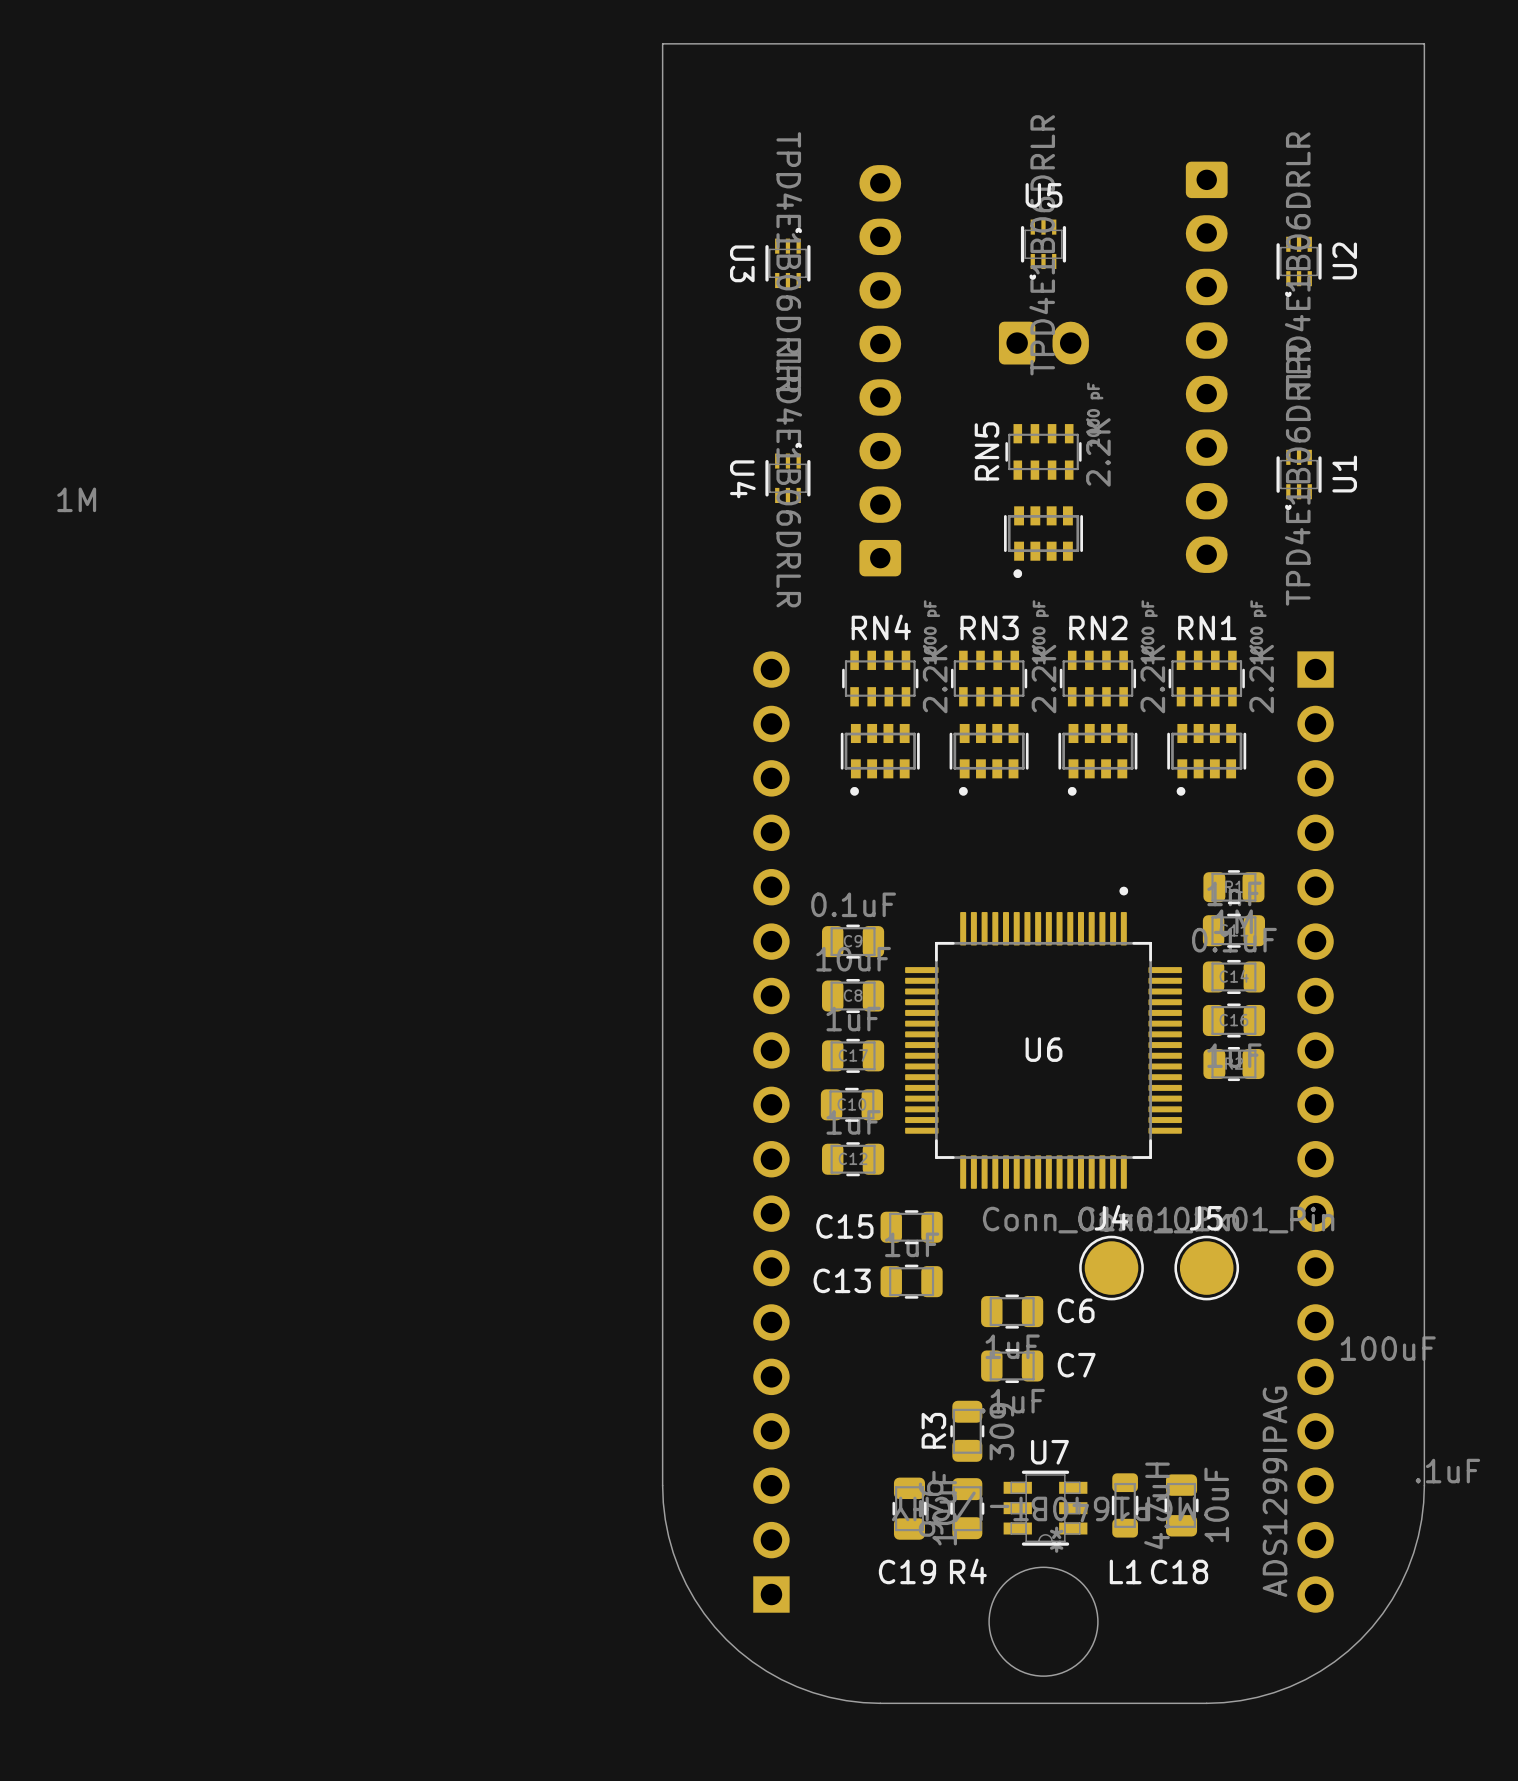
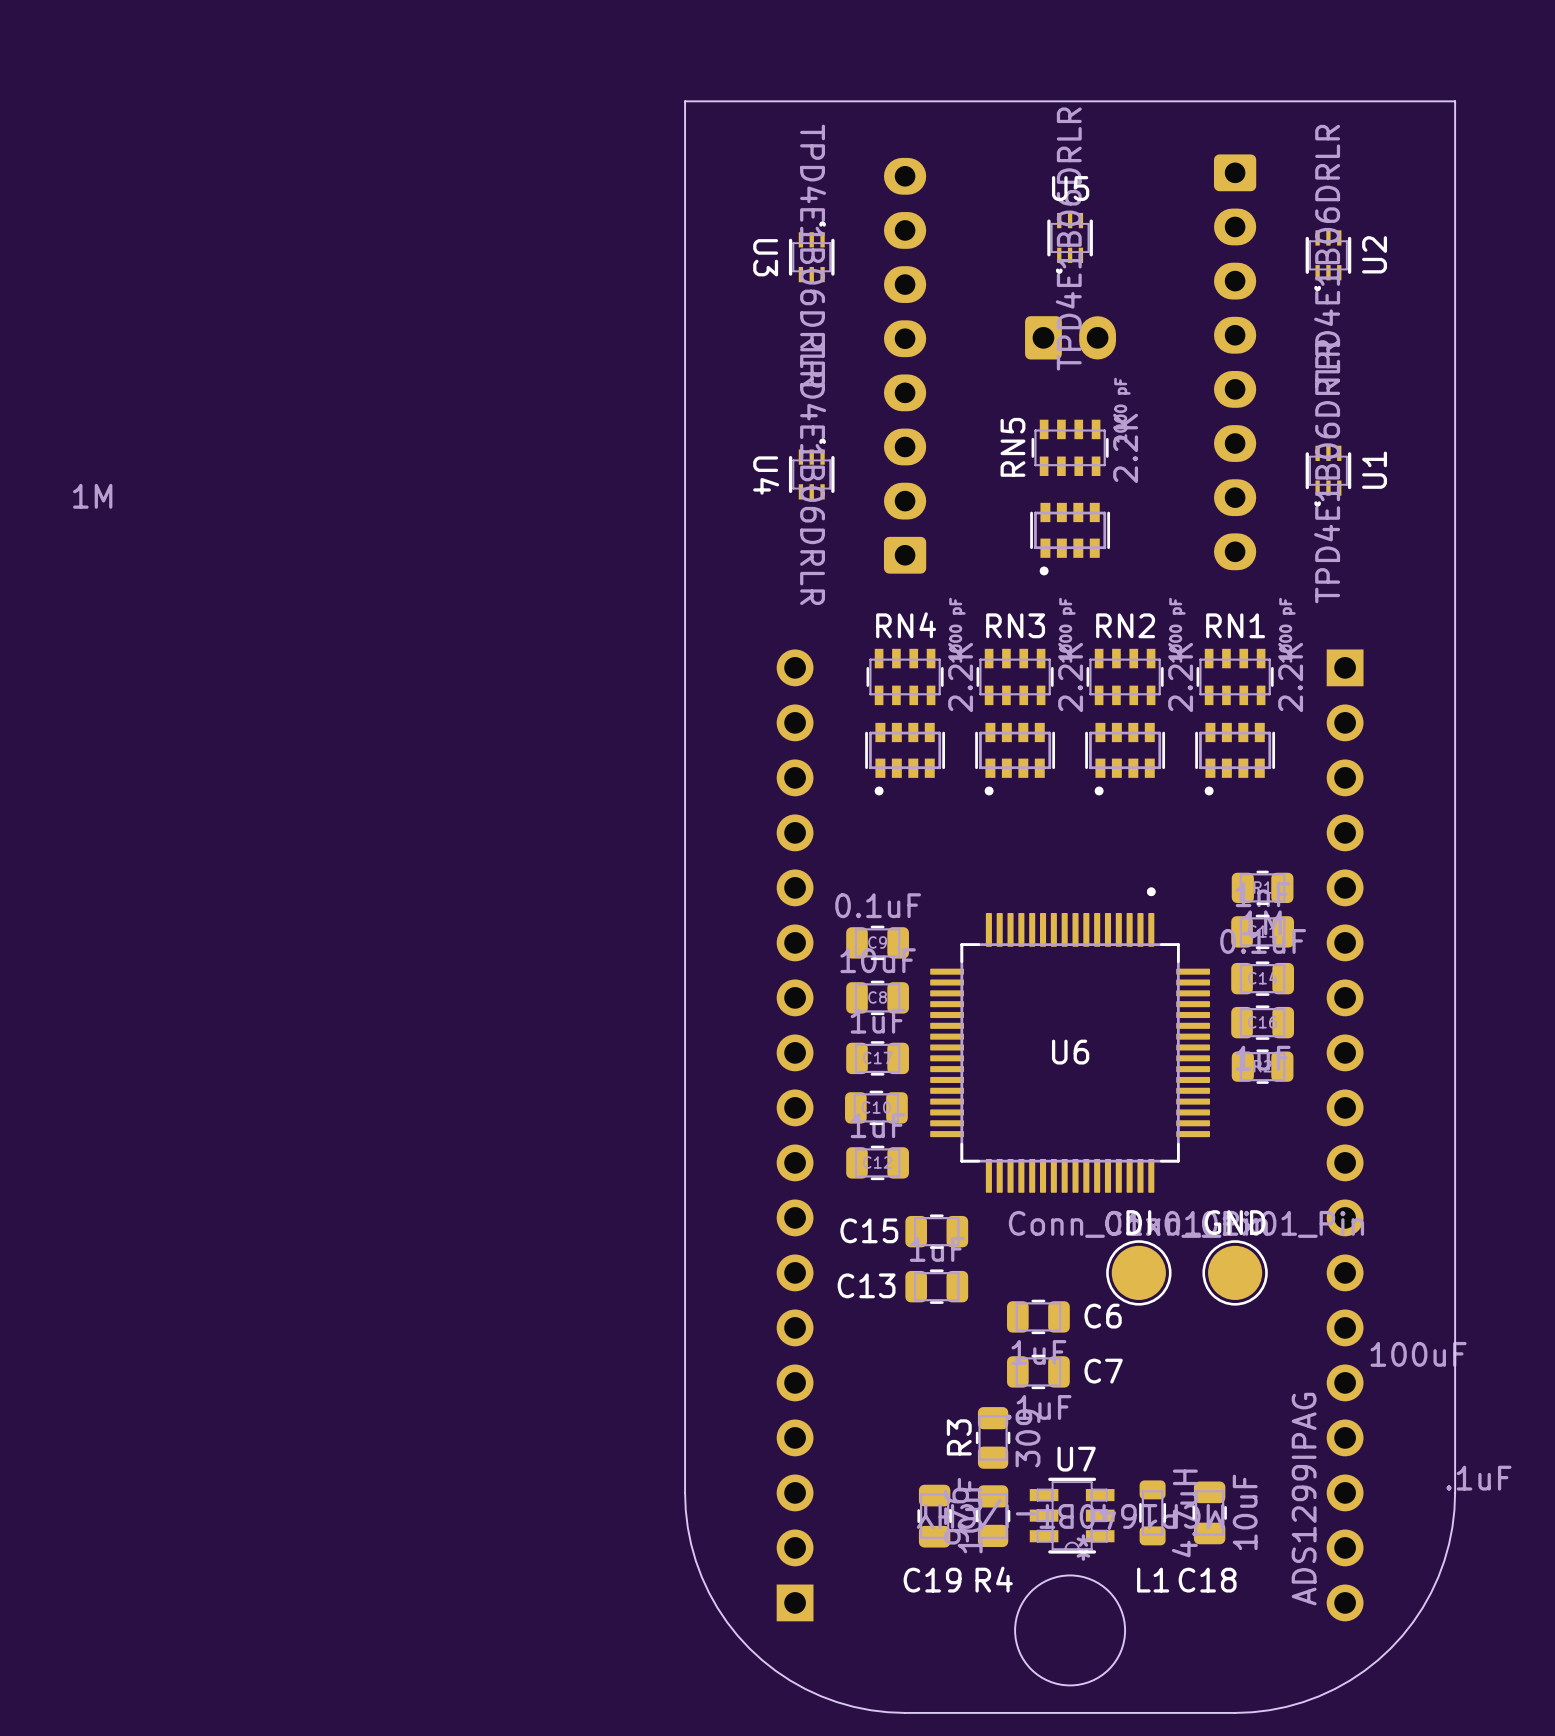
board edge: (662, 109) (662, 43) (1424, 43) (1424, 109) -> (685, 101) (1455, 101)
J4 name: J4 (1111, 1217) -> DI (1138, 1222)
J5 name: J5 (1206, 1218) -> GND (1235, 1222)

